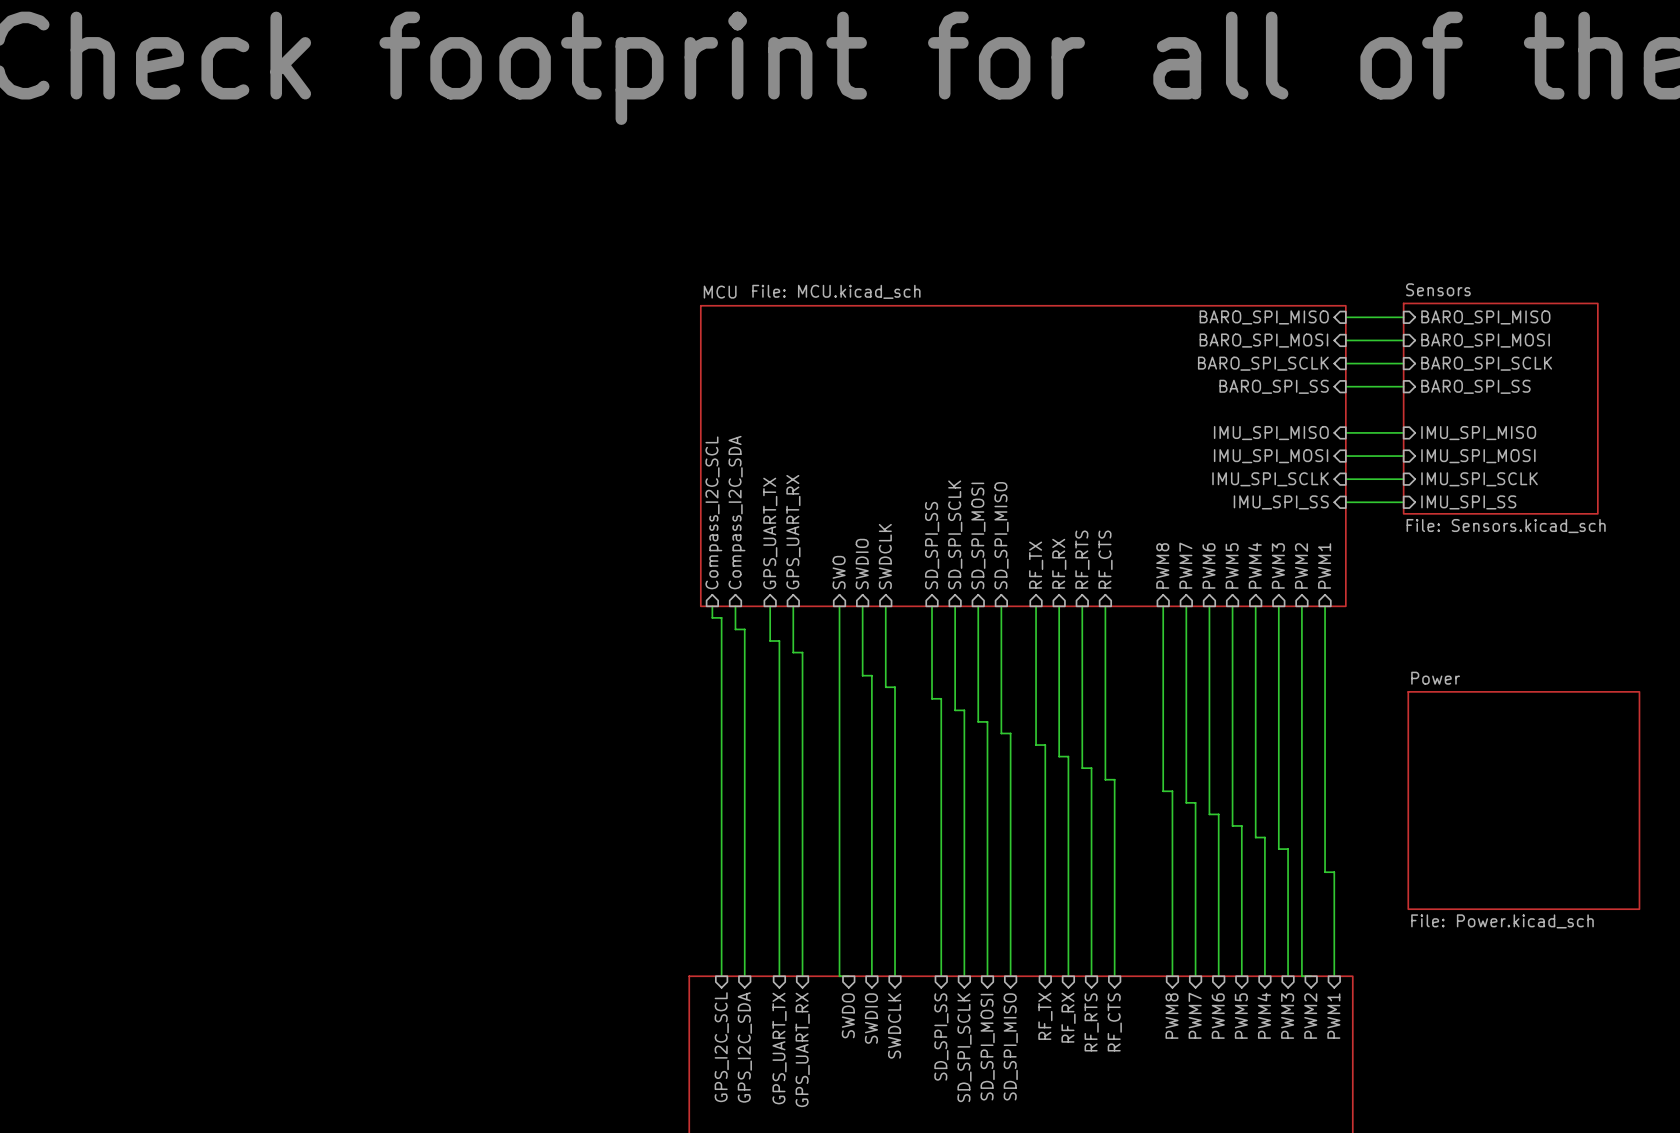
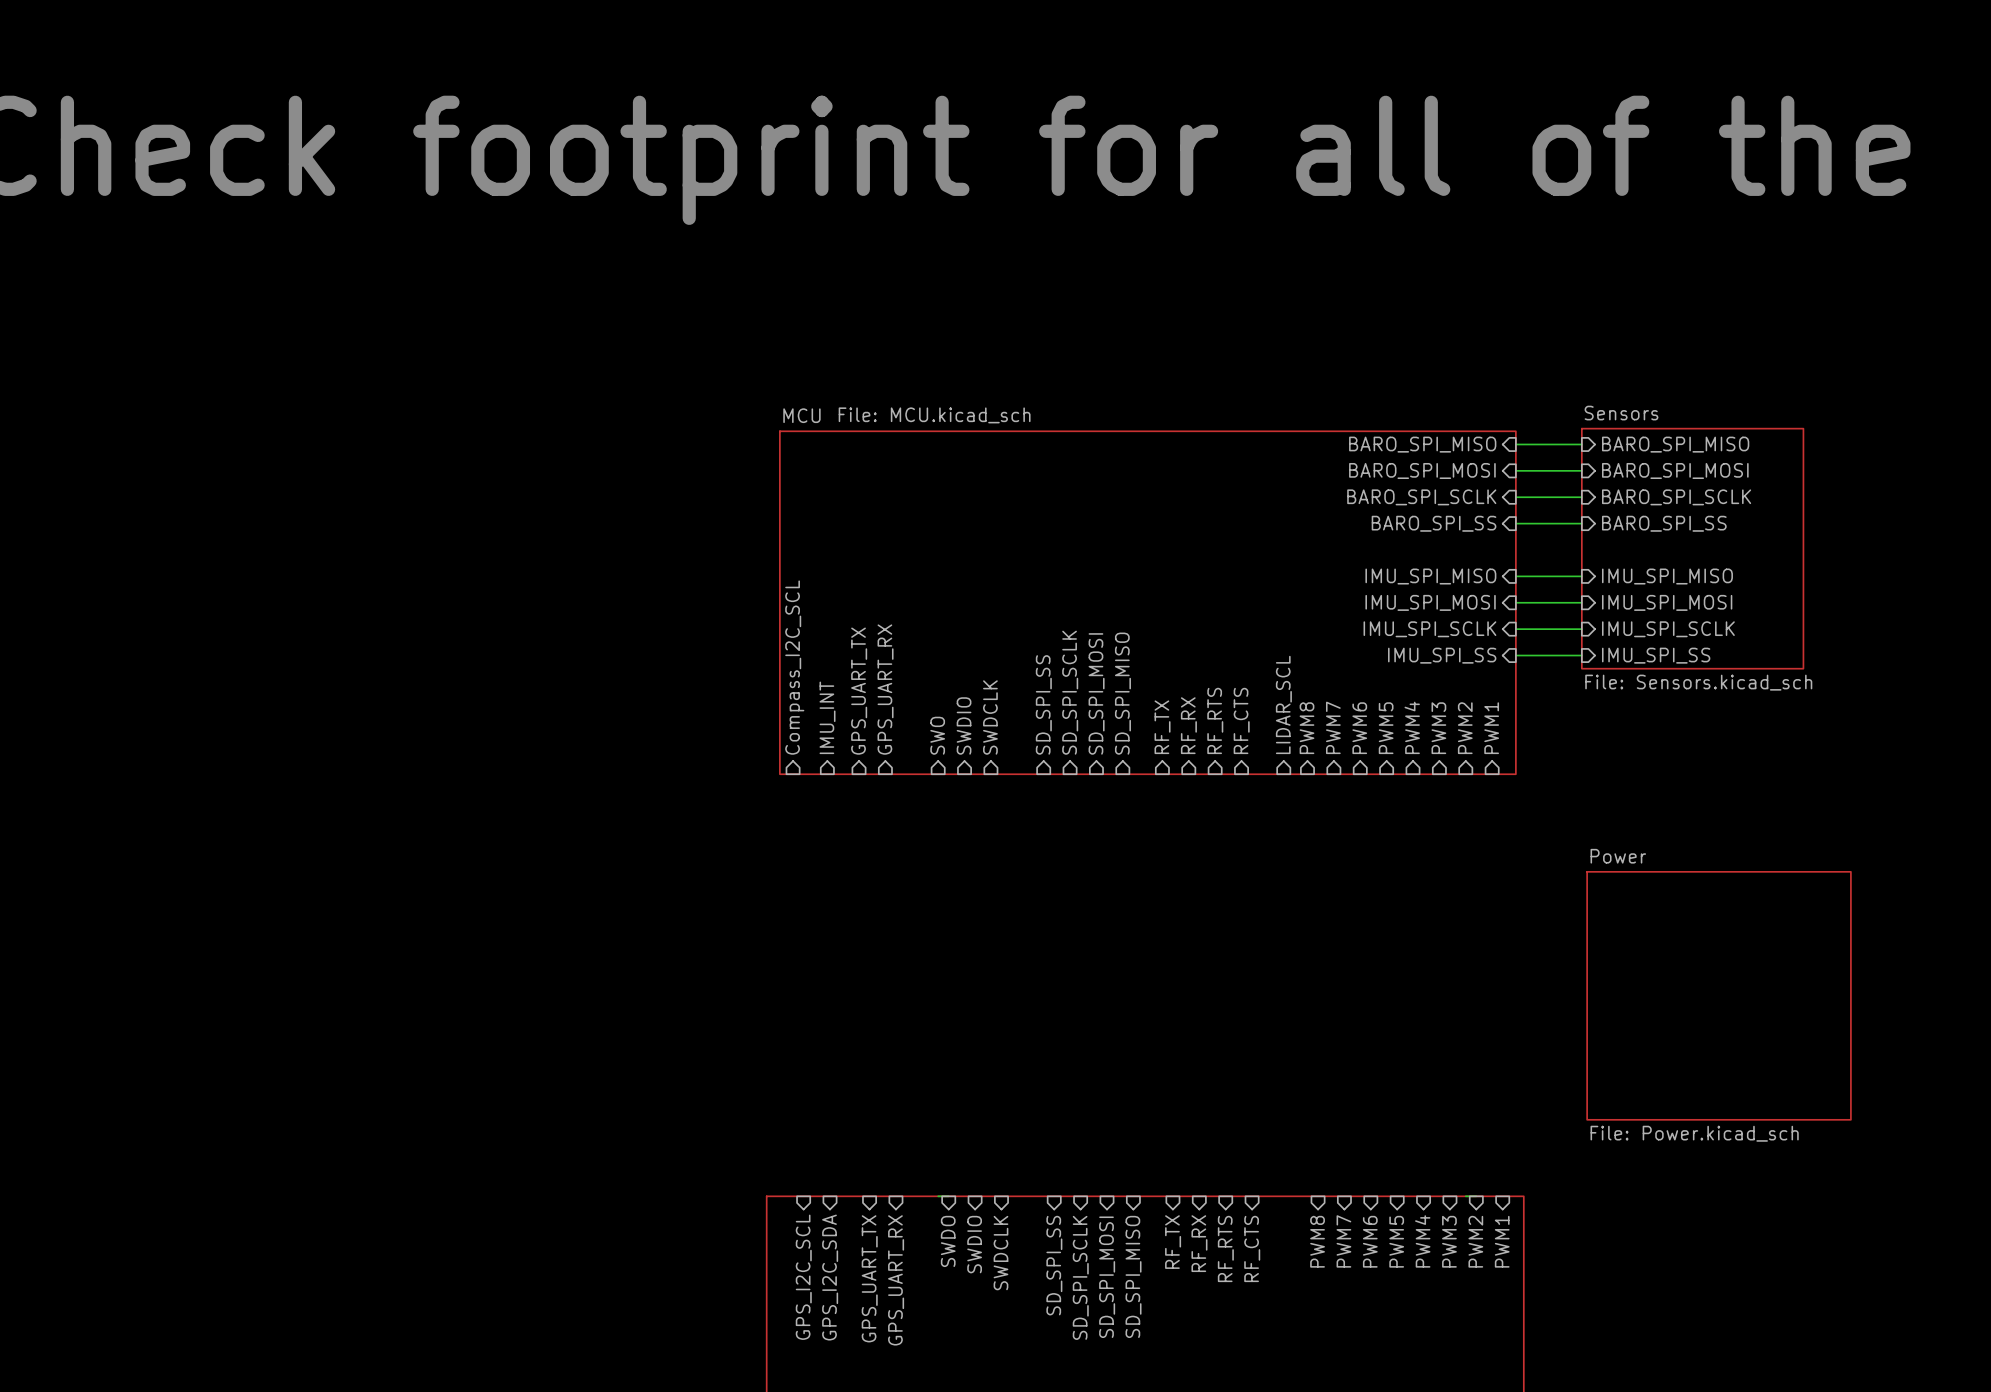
sheet pin: Compass_I2C_SDA (736, 512) -> IMU_INT (827, 717)
sheet pin: none -> LIDAR_SCL (1283, 704)
wire: (712, 606) (712, 617) (721, 617) (721, 976) -> none
wire: (735, 606) (735, 629) (744, 629) (744, 976) -> none
wire: (770, 606) (770, 641) (779, 641) (779, 976) -> none
wire: (793, 606) (793, 652) (802, 652) (802, 976) -> none
wire: (839, 606) (839, 976) -> none
wire: (862, 606) (862, 675) (871, 675) (871, 976) -> none
wire: (885, 606) (885, 687) (895, 687) (895, 976) -> none
wire: (932, 606) (932, 698) (941, 698) (941, 976) -> none
wire: (955, 606) (955, 710) (964, 710) (964, 976) -> none
wire: (978, 606) (978, 721) (987, 721) (987, 976) -> none
wire: (1001, 606) (1001, 733) (1010, 733) (1010, 976) -> none
wire: (1036, 606) (1036, 745) (1045, 745) (1045, 976) -> none
wire: (1059, 606) (1059, 756) (1068, 756) (1068, 976) -> none
wire: (1082, 606) (1082, 768) (1091, 768) (1091, 976) -> none
wire: (1105, 606) (1105, 779) (1114, 779) (1114, 976) -> none
wire: (1163, 606) (1163, 791) (1172, 791) (1172, 976) -> none
wire: (1186, 606) (1186, 802) (1195, 802) (1195, 976) -> none
wire: (1209, 606) (1209, 814) (1218, 814) (1218, 976) -> none
wire: (1232, 606) (1232, 825) (1241, 825) (1241, 976) -> none
wire: (1255, 606) (1255, 837) (1264, 837) (1264, 976) -> none
wire: (1278, 606) (1278, 849) (1288, 849) (1288, 976) -> none
wire: (1301, 606) (1301, 976) -> none
wire: (1325, 606) (1325, 872) (1334, 872) (1334, 976) -> none

